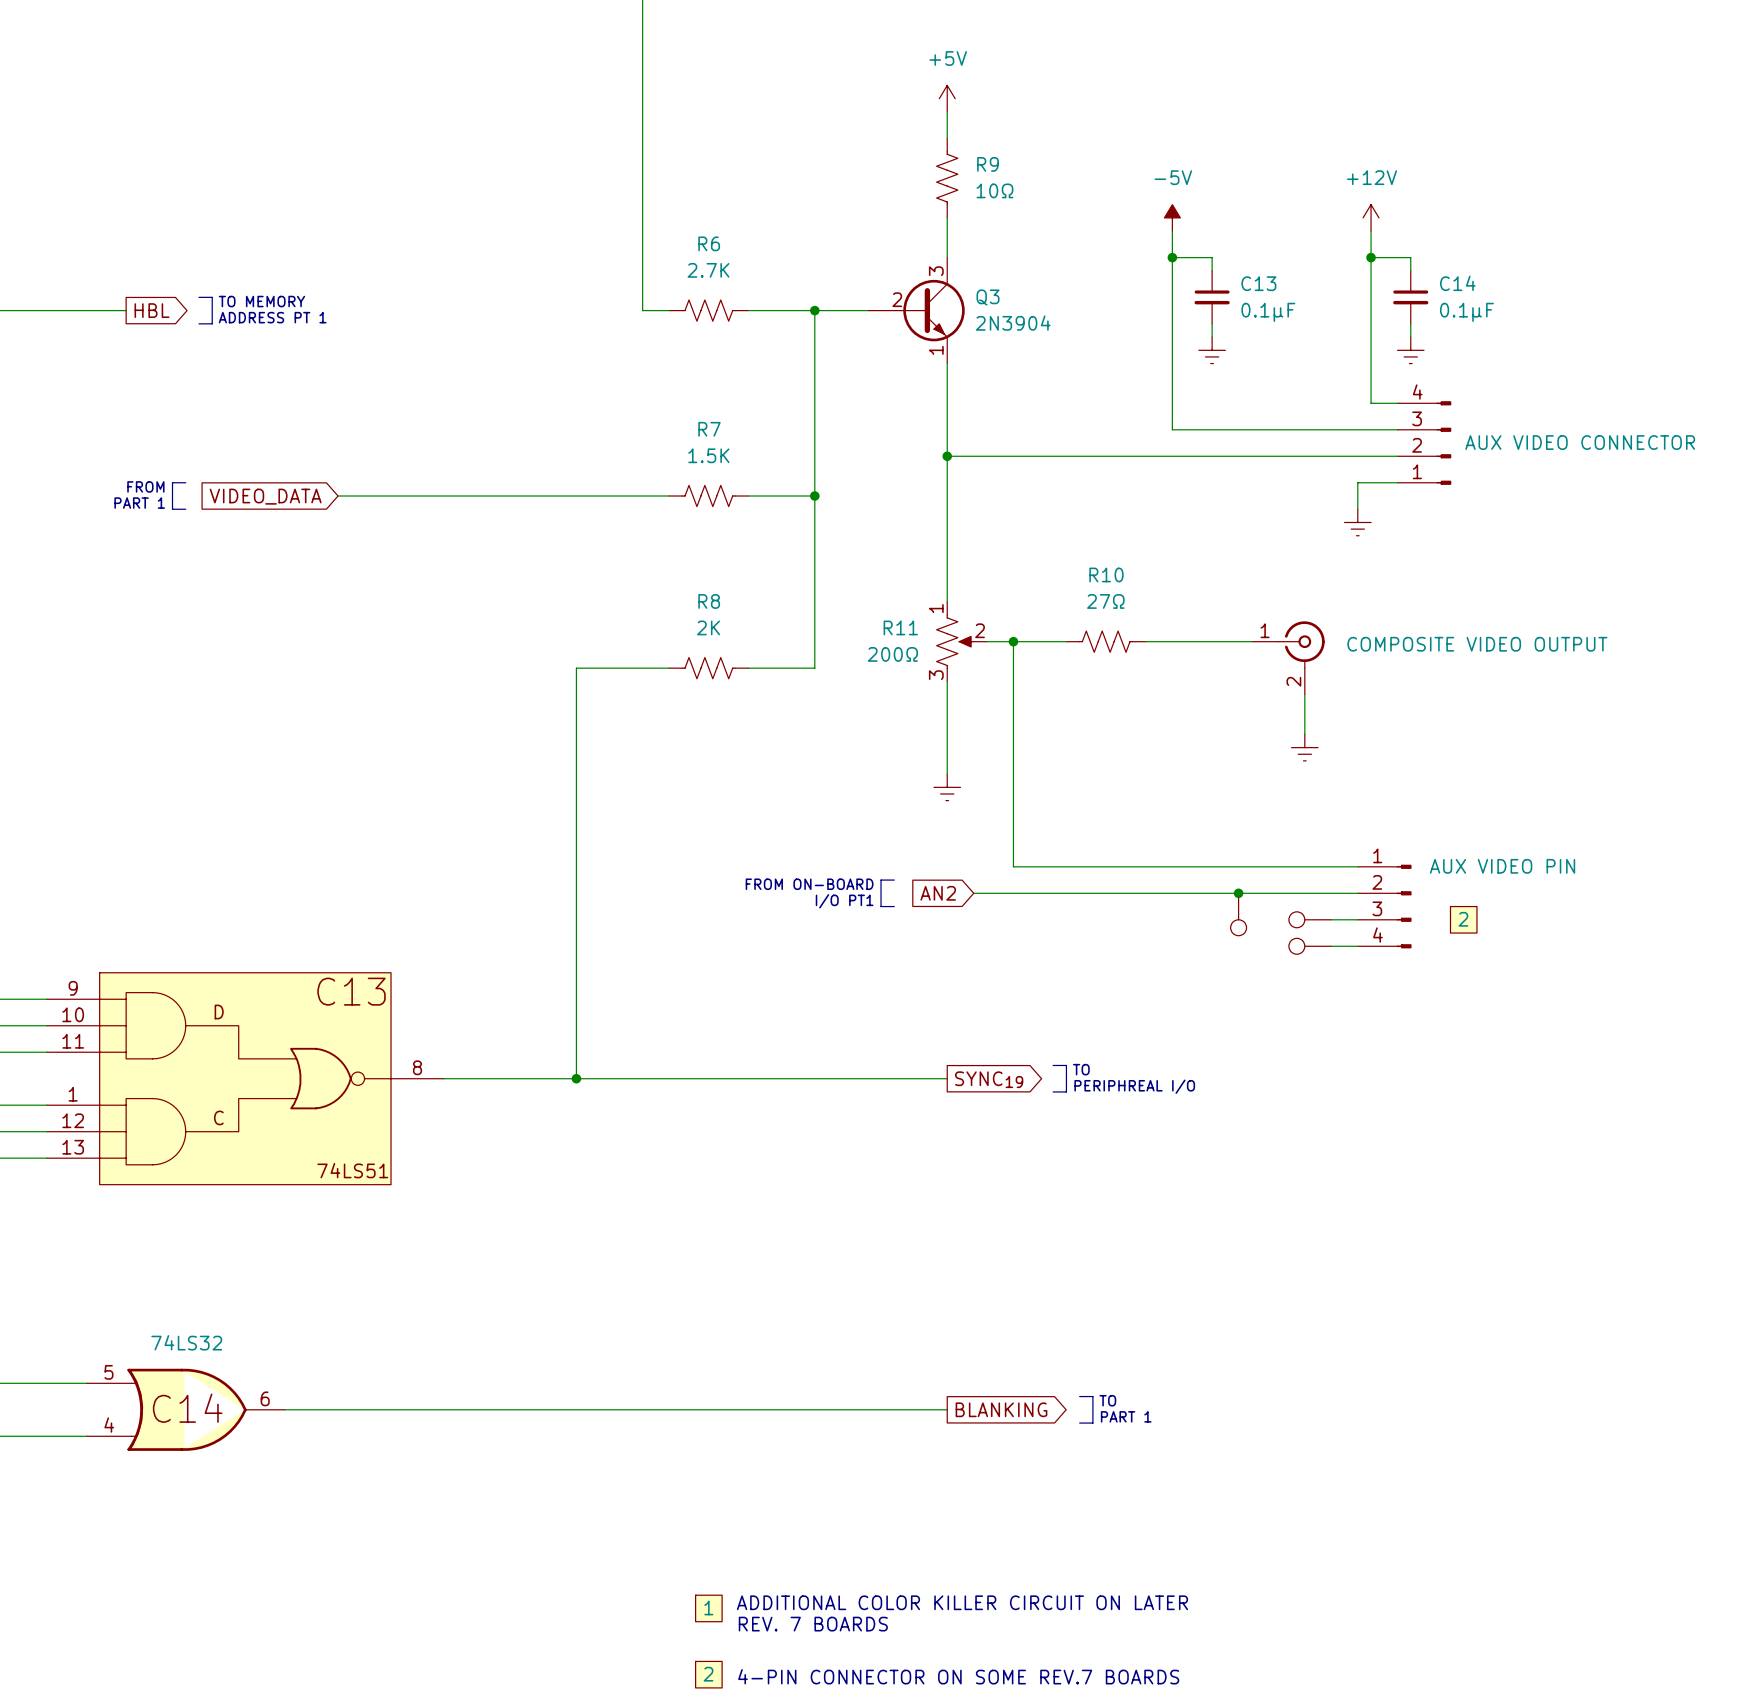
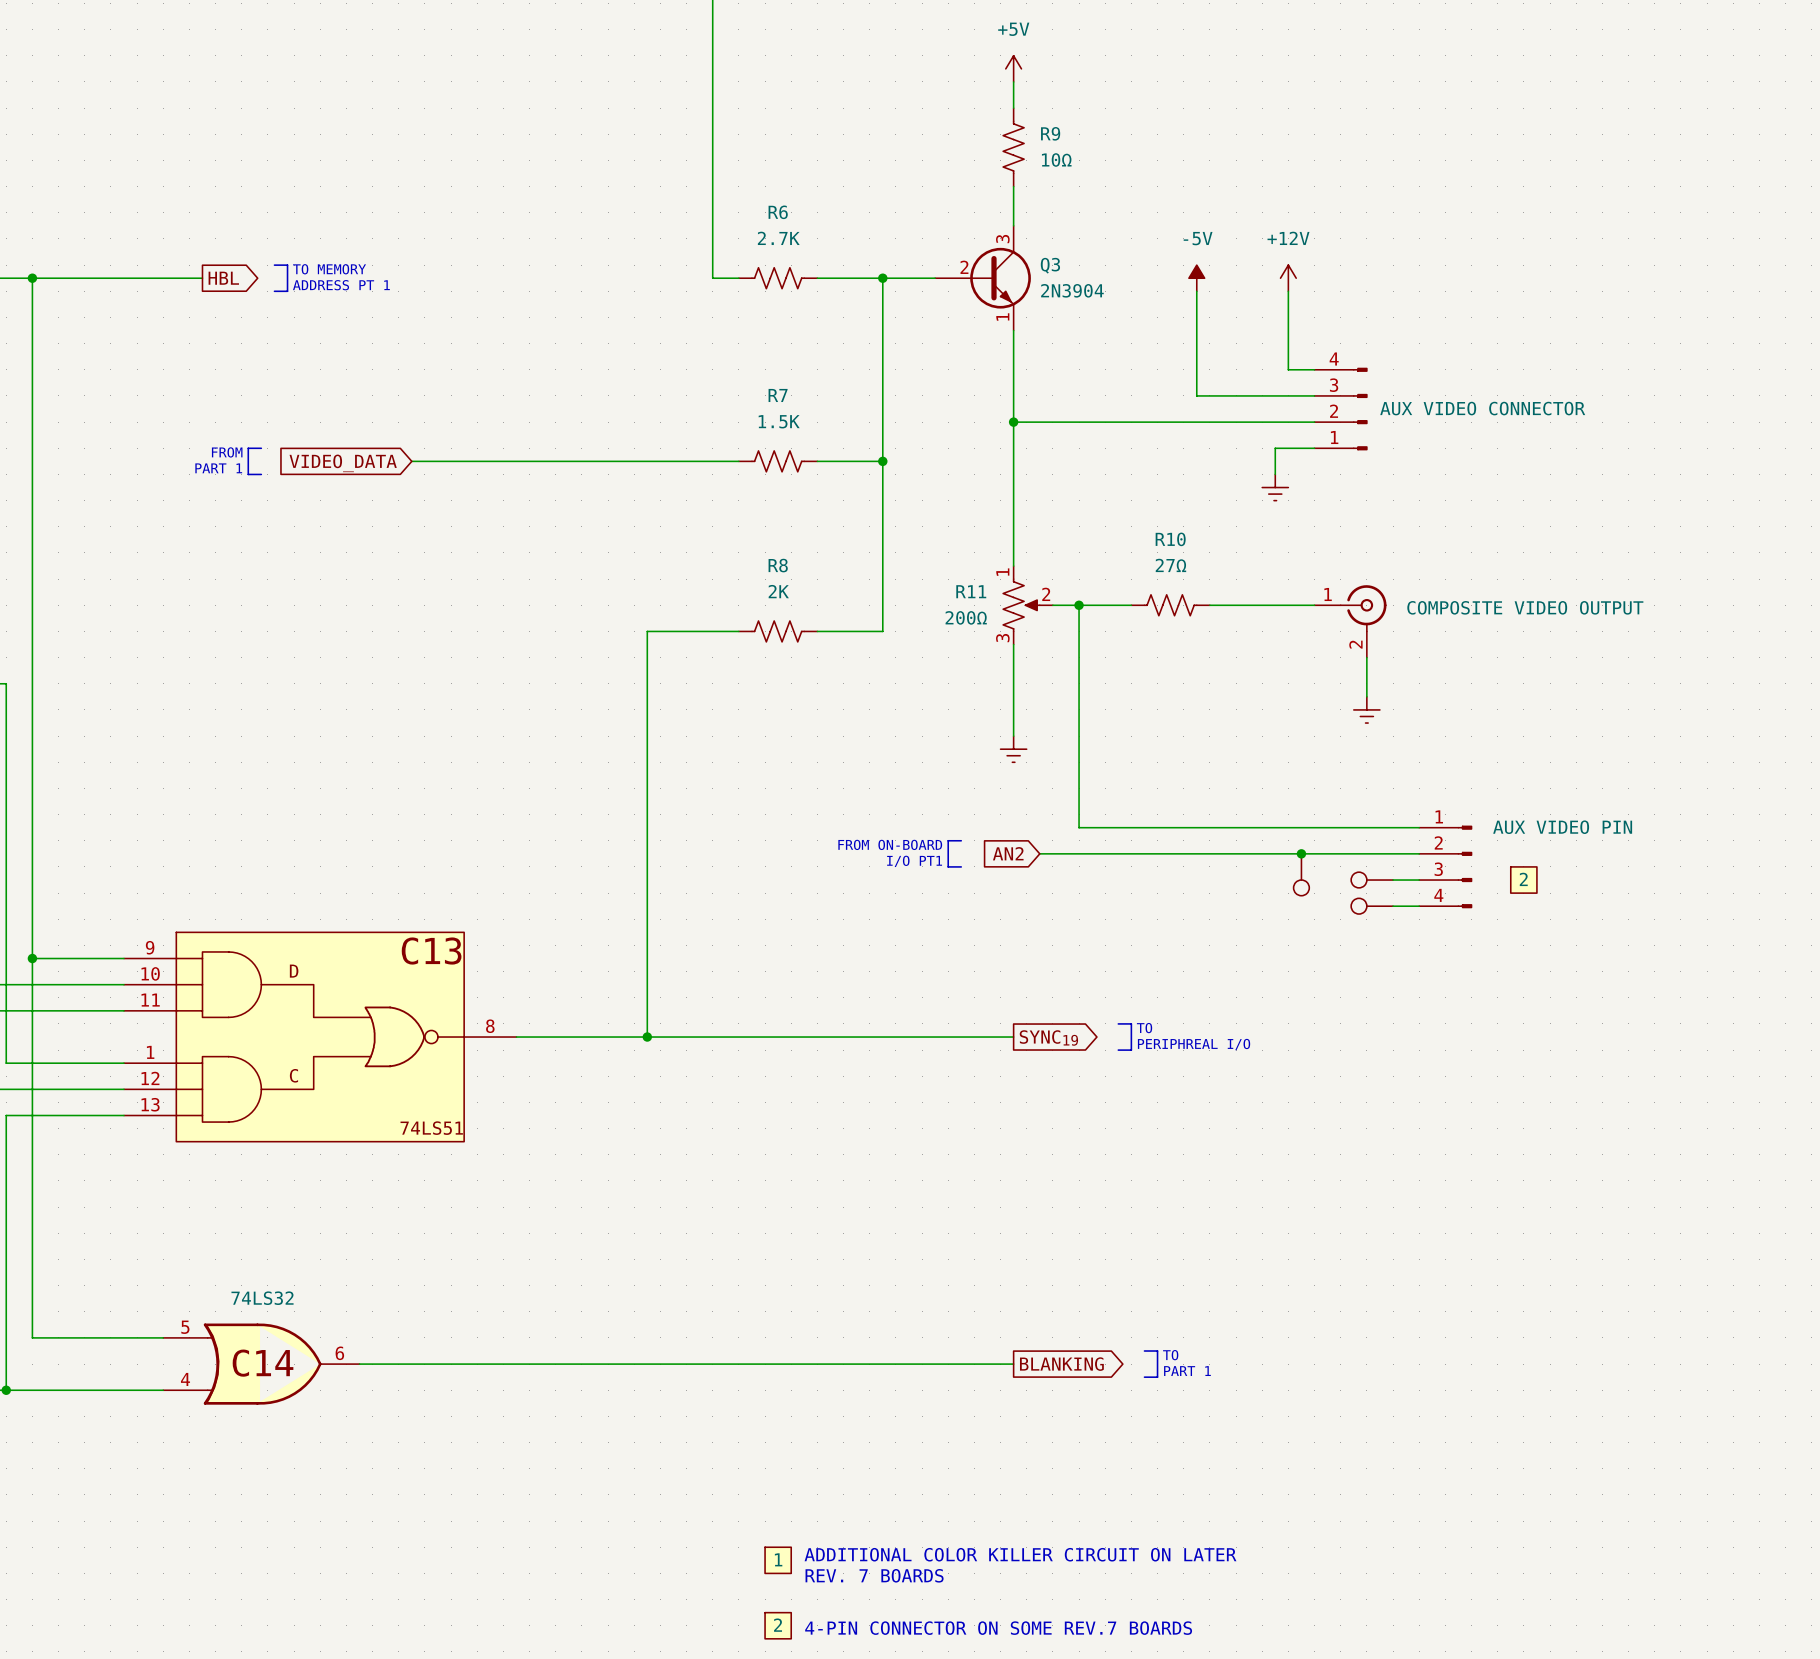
power symbol position: -5V (1172, 217) -> -5V (1196, 278)
power symbol position: +12V (1371, 217) -> +12V (1288, 278)
wire: (1172, 231) (1172, 429) -> (1196, 291) (1196, 395) (1236, 395)
wire: (1371, 231) (1371, 403) (1397, 403) -> none
wire: (1172, 257) (1212, 257) (1212, 270) -> none
junction: (1172, 257) -> none
wire: (1371, 257) (1410, 257) (1410, 270) -> none
junction: (1371, 257) -> none
C13: 0.1µF (1212, 297) -> none
C14: 0.1µF (1410, 297) -> none
wire: (1212, 323) (1212, 337) -> none
wire: none -> (1288, 291) (1288, 369) (1314, 369)
wire: (1410, 323) (1410, 337) -> none
power symbol: (1212, 350) -> none
power symbol: (1410, 350) -> none
wire: (1251, 429) (1397, 429) -> none
part position: (1424, 443) -> (1341, 409)
wire: (1251, 456) (1397, 456) -> none
wire: (1397, 482) (1357, 482) (1357, 509) -> (1314, 448) (1275, 448) (1275, 474)
power symbol: none -> (1275, 487)
power symbol: (1357, 522) -> none

